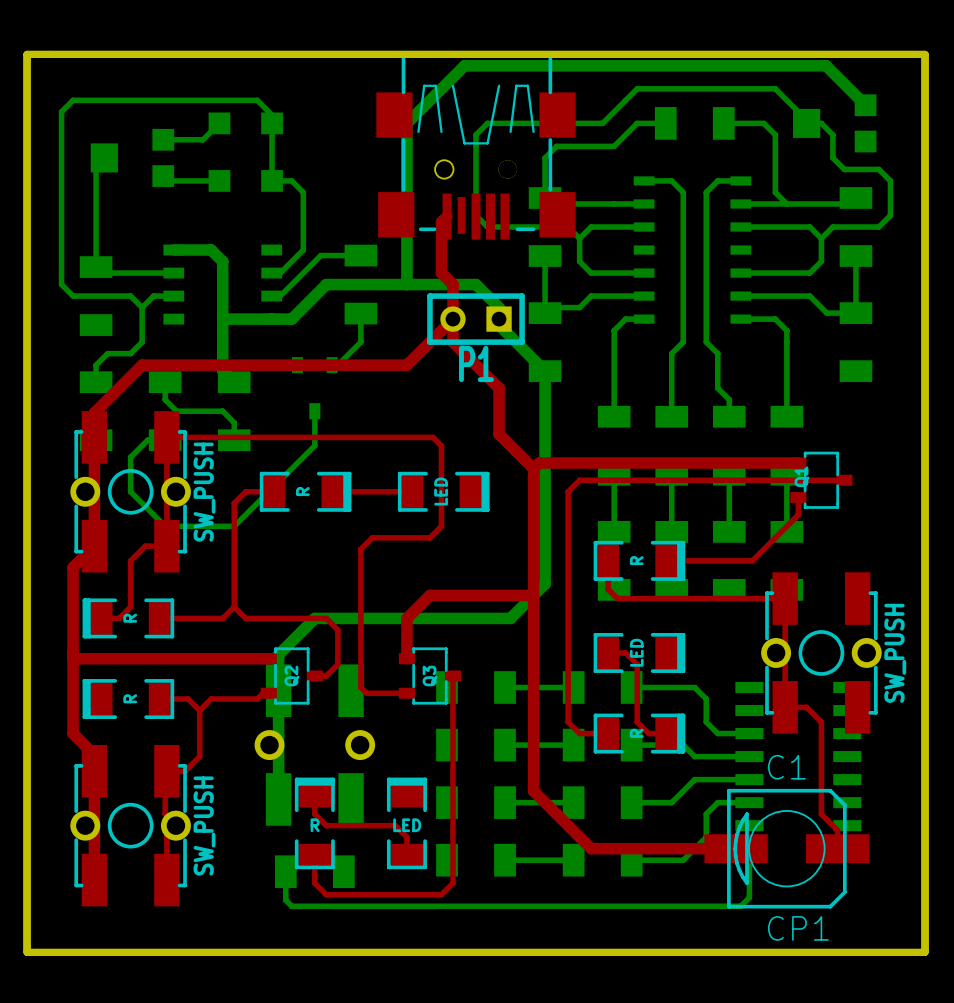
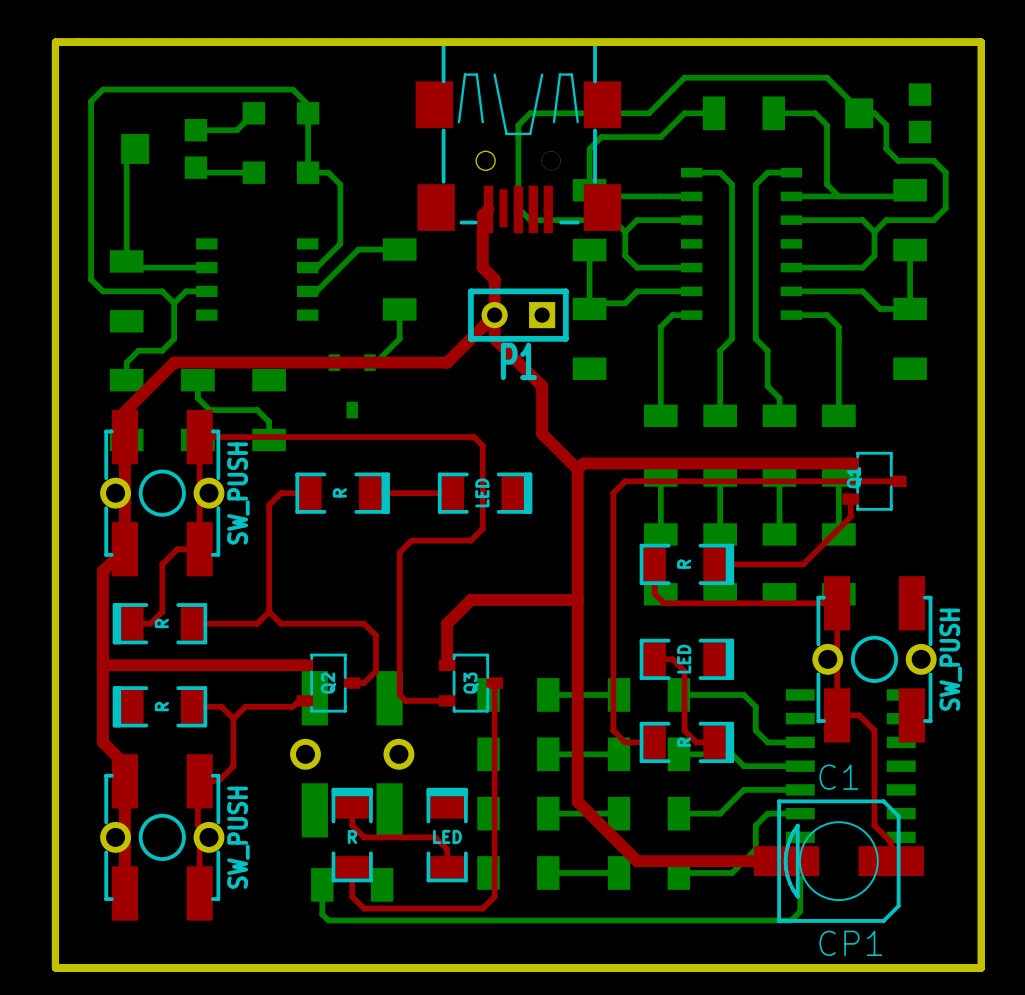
bottom track: (865, 105) (826, 65) (464, 65) (406, 123) (406, 284) -> none
bottom track: (173, 250) (211, 250) (222, 261) (222, 370) (234, 382) -> none
bottom track: (222, 319) (291, 319) (326, 284) (476, 284) (499, 307) (499, 325) (545, 371) (545, 583) (510, 618) (314, 618) (278, 654) (278, 799) -> none
bottom track: (314, 411) (314, 445) (234, 526) (165, 526) (130, 491) (130, 457) (147, 440) (165, 440) -> none

